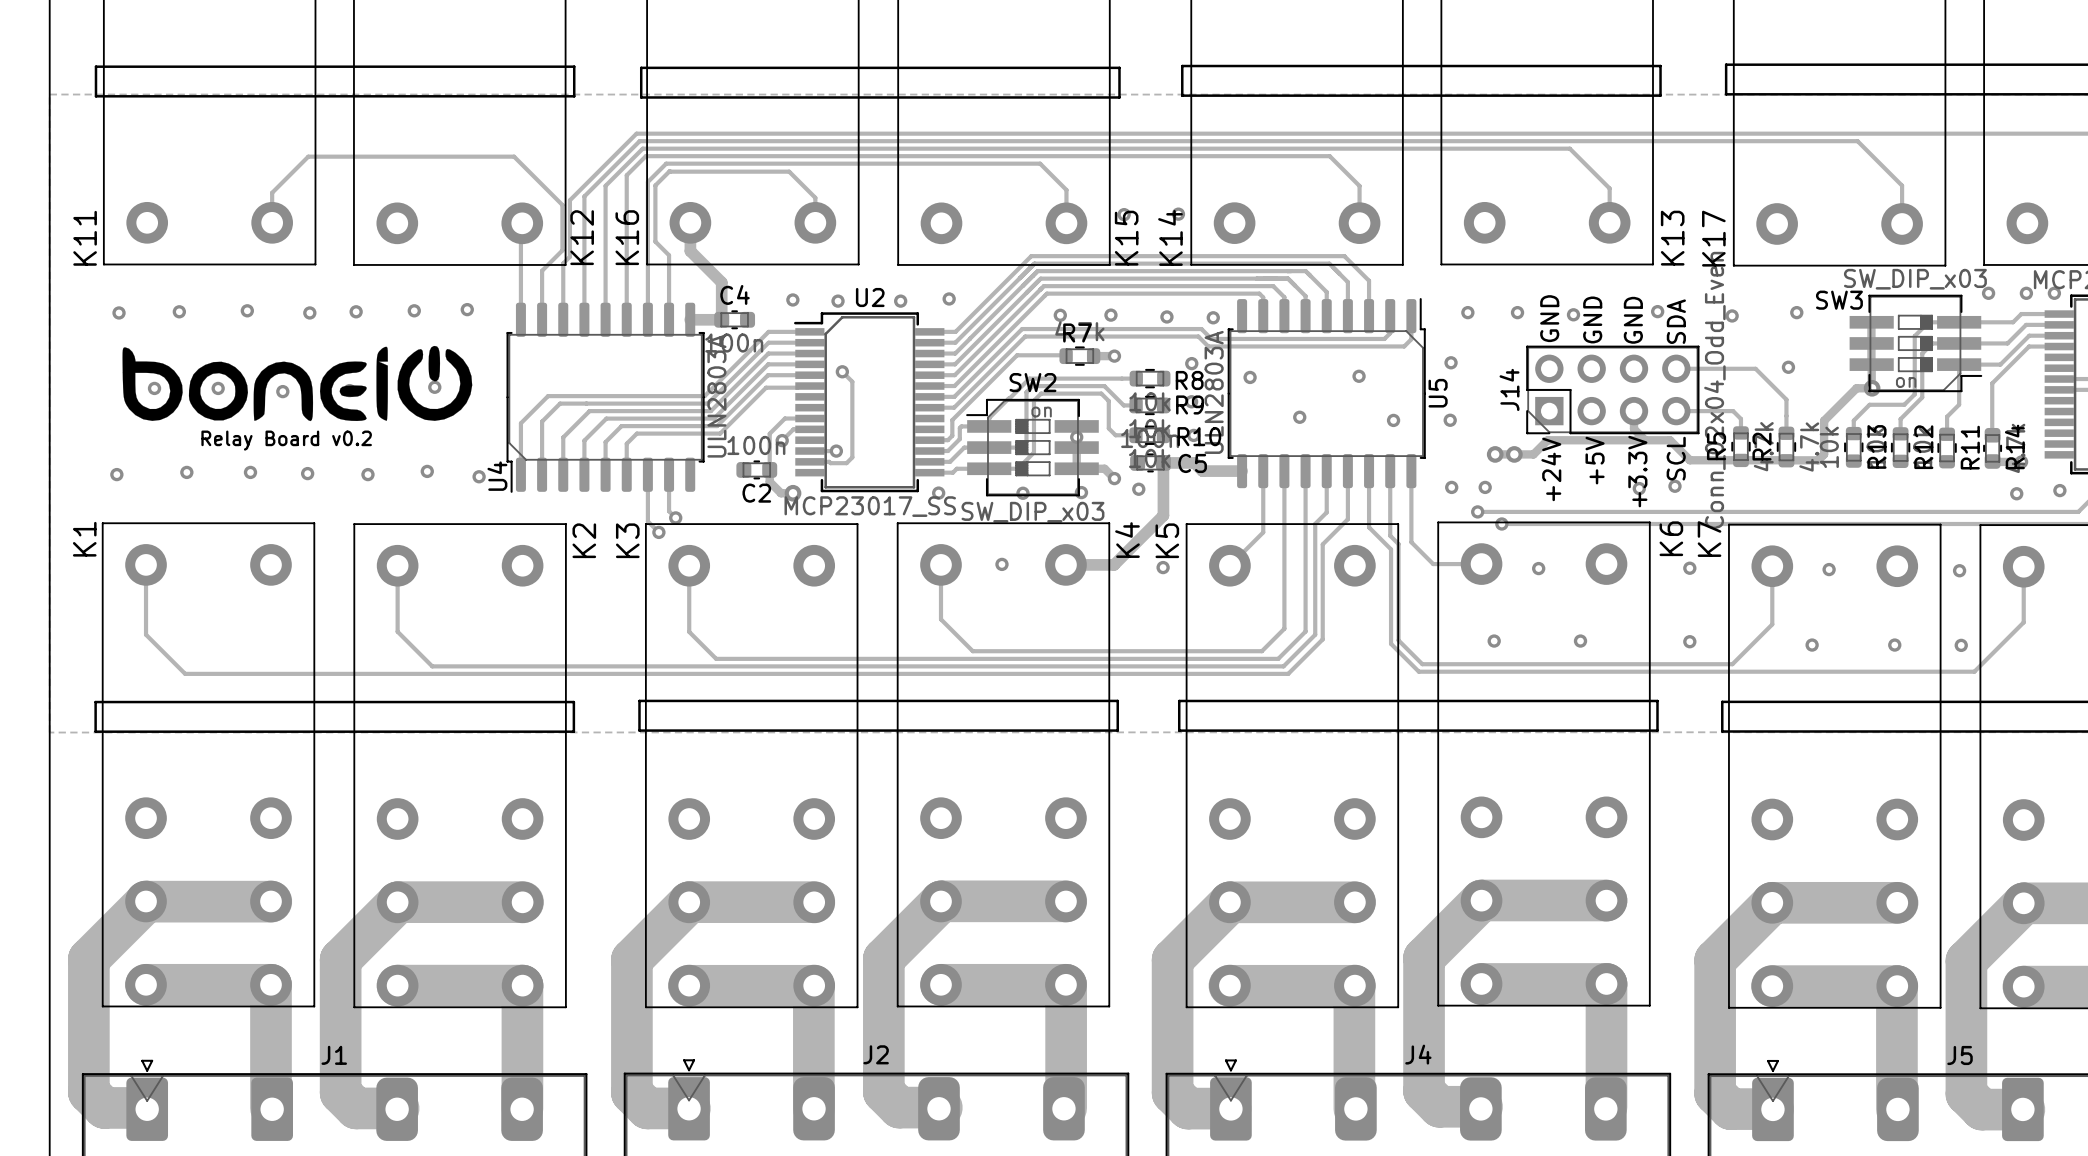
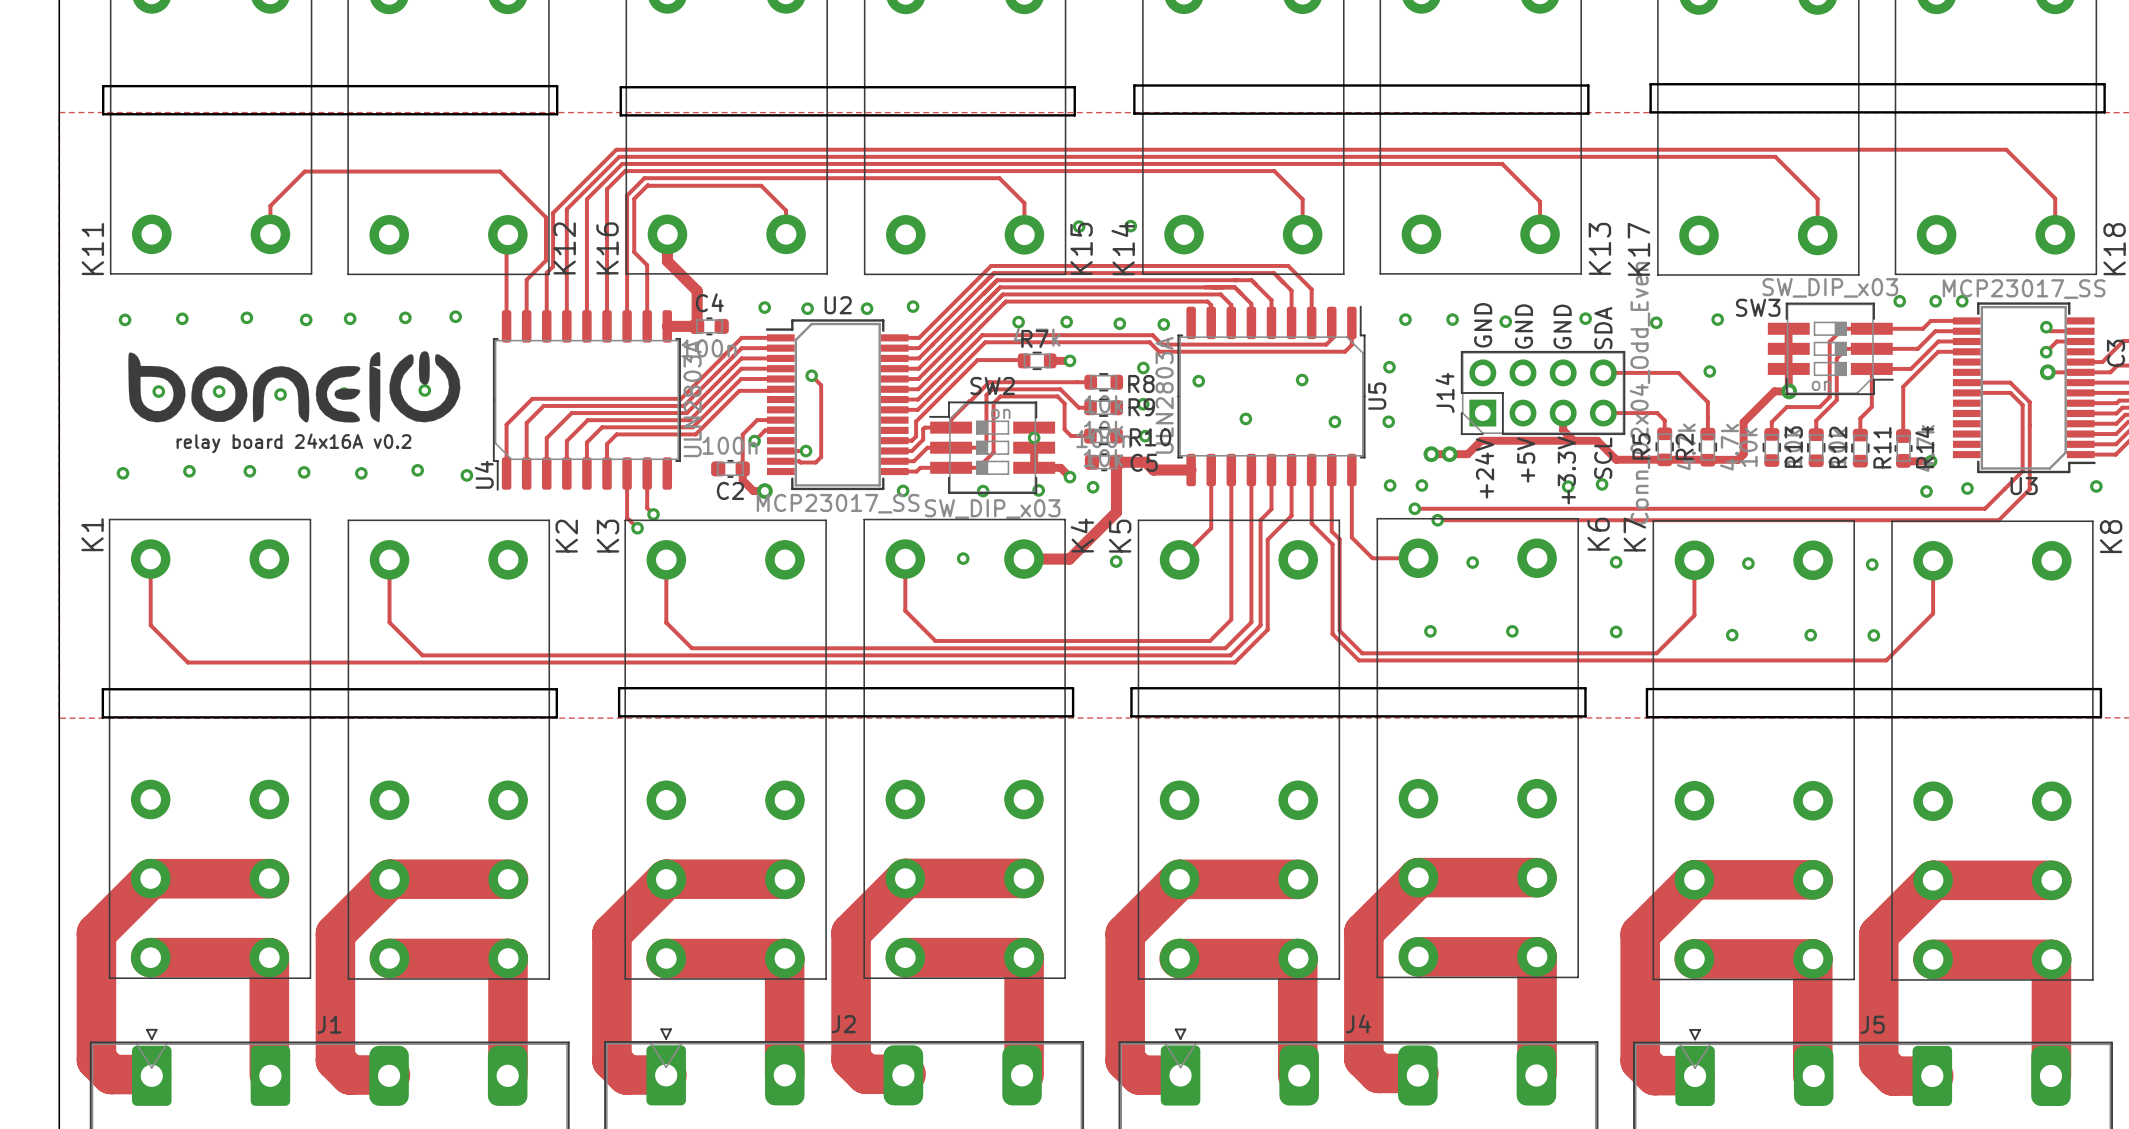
text: Relay Board v0.2 (286, 440) -> relay board 24x16A v0.2 (293, 443)

